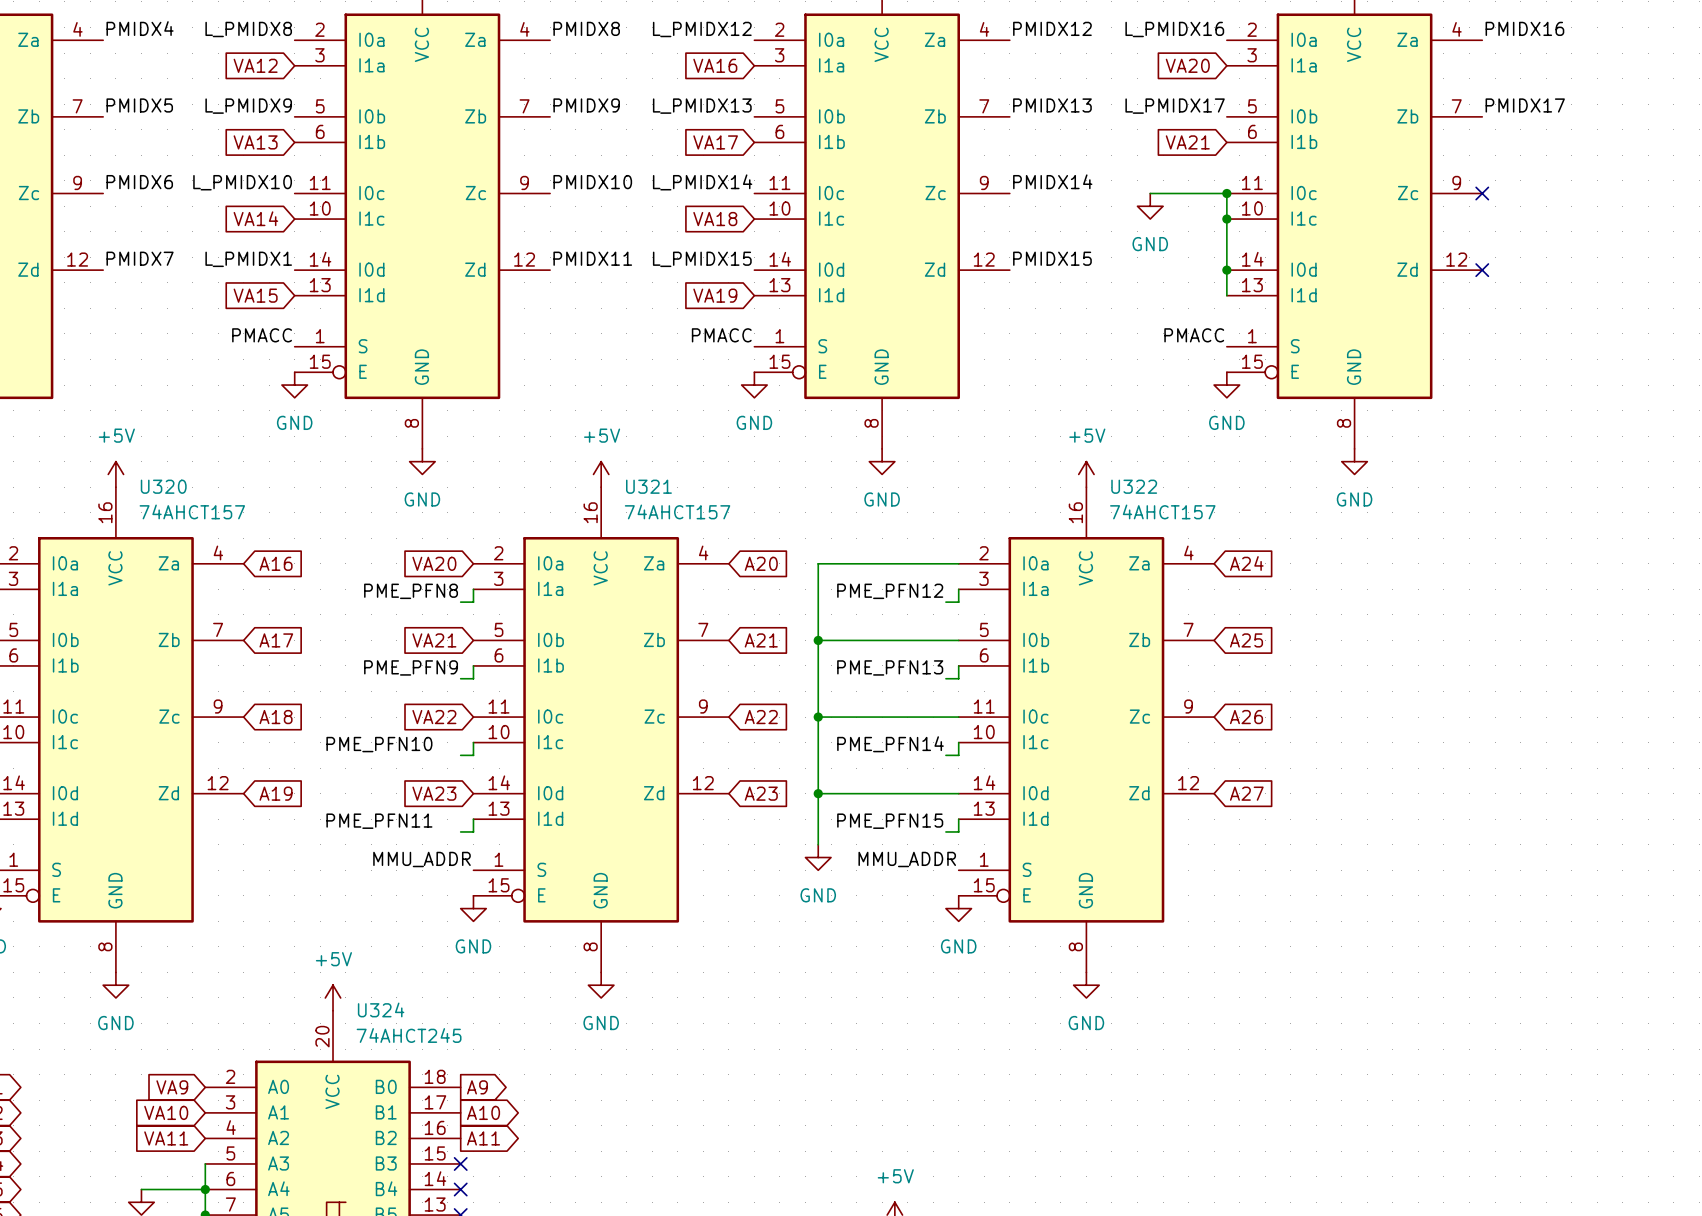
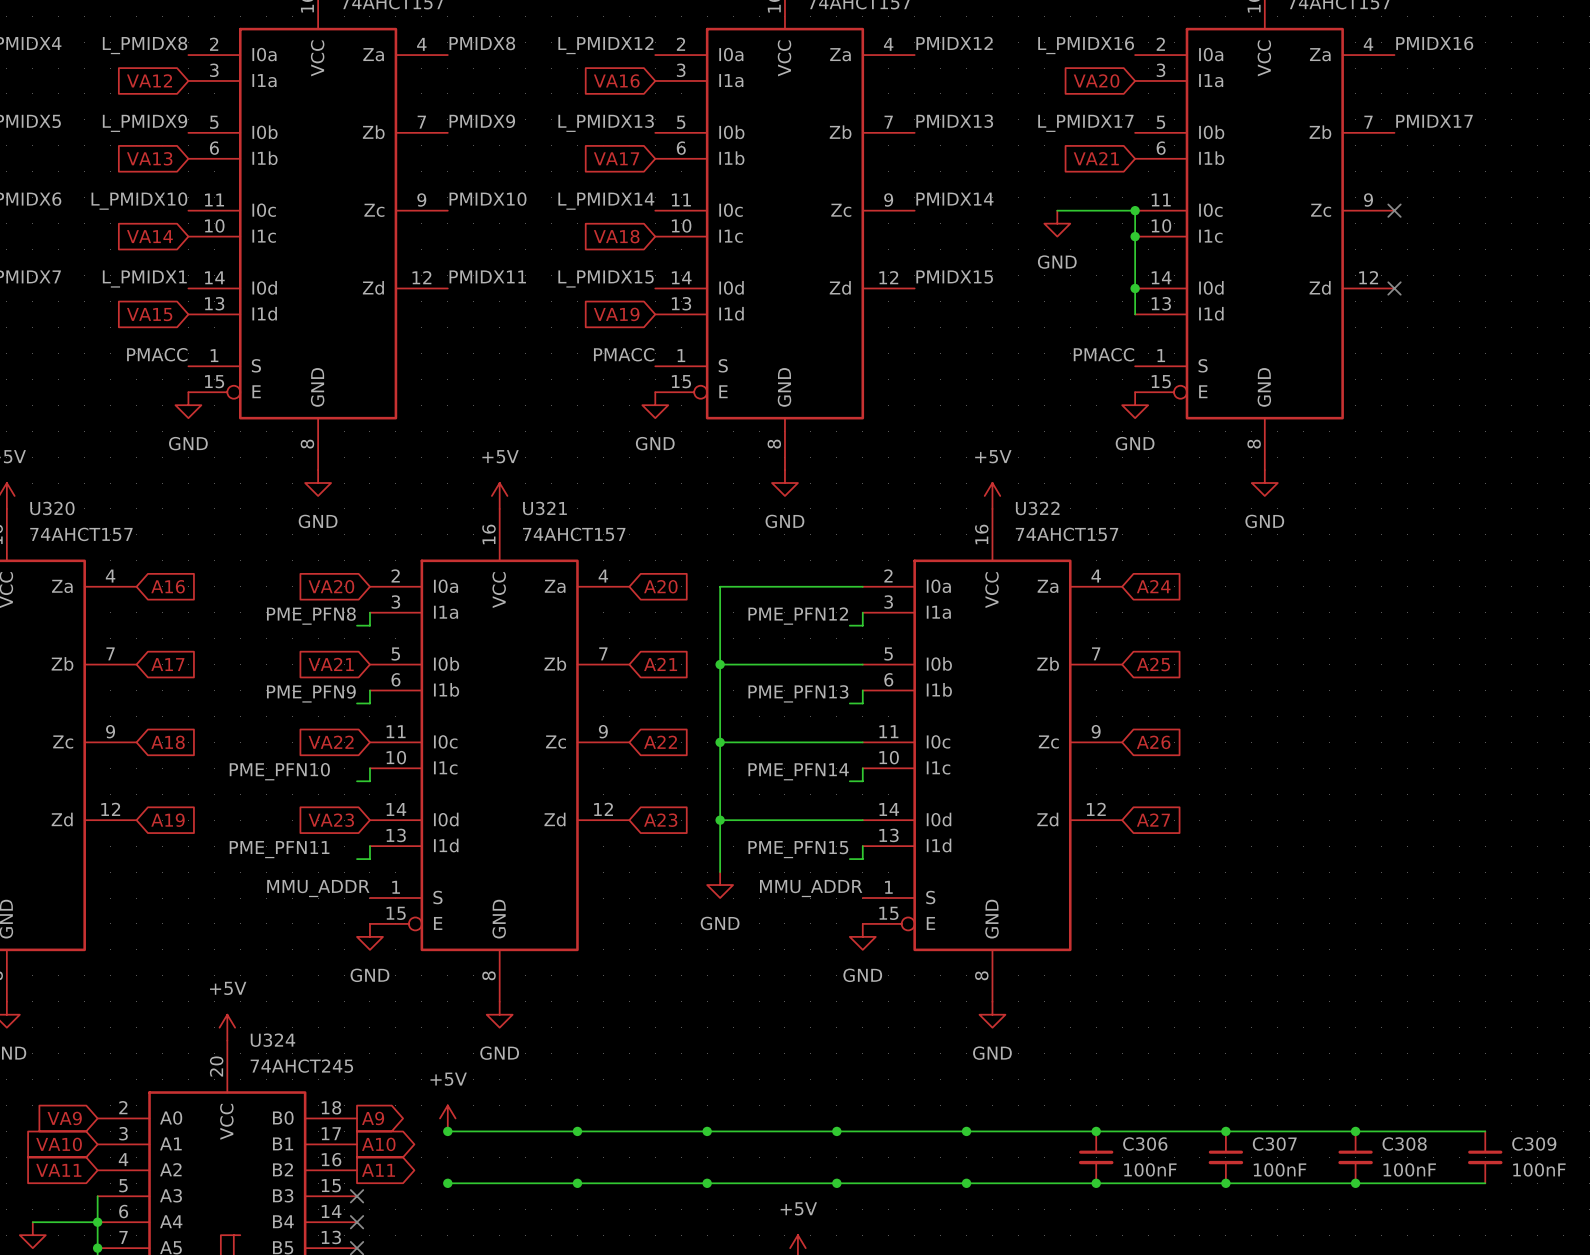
power symbol: none -> +5V (447, 1118)
wire: none -> (447, 1131) (1485, 1131)
junction: none -> (447, 1131)
junction: none -> (577, 1131)
junction: none -> (707, 1131)
junction: none -> (836, 1131)
junction: none -> (966, 1131)
junction: none -> (1096, 1131)
junction: none -> (1225, 1131)
junction: none -> (1355, 1131)
C306: none -> 100nF (1096, 1157)
C307: none -> 100nF (1225, 1157)
C308: none -> 100nF (1355, 1157)
C309: none -> 100nF (1485, 1157)
wire: none -> (447, 1183) (1485, 1183)
junction: none -> (447, 1183)
junction: none -> (577, 1183)
junction: none -> (707, 1183)
junction: none -> (836, 1183)
junction: none -> (966, 1183)
junction: none -> (1096, 1183)
junction: none -> (1225, 1183)
junction: none -> (1355, 1183)

